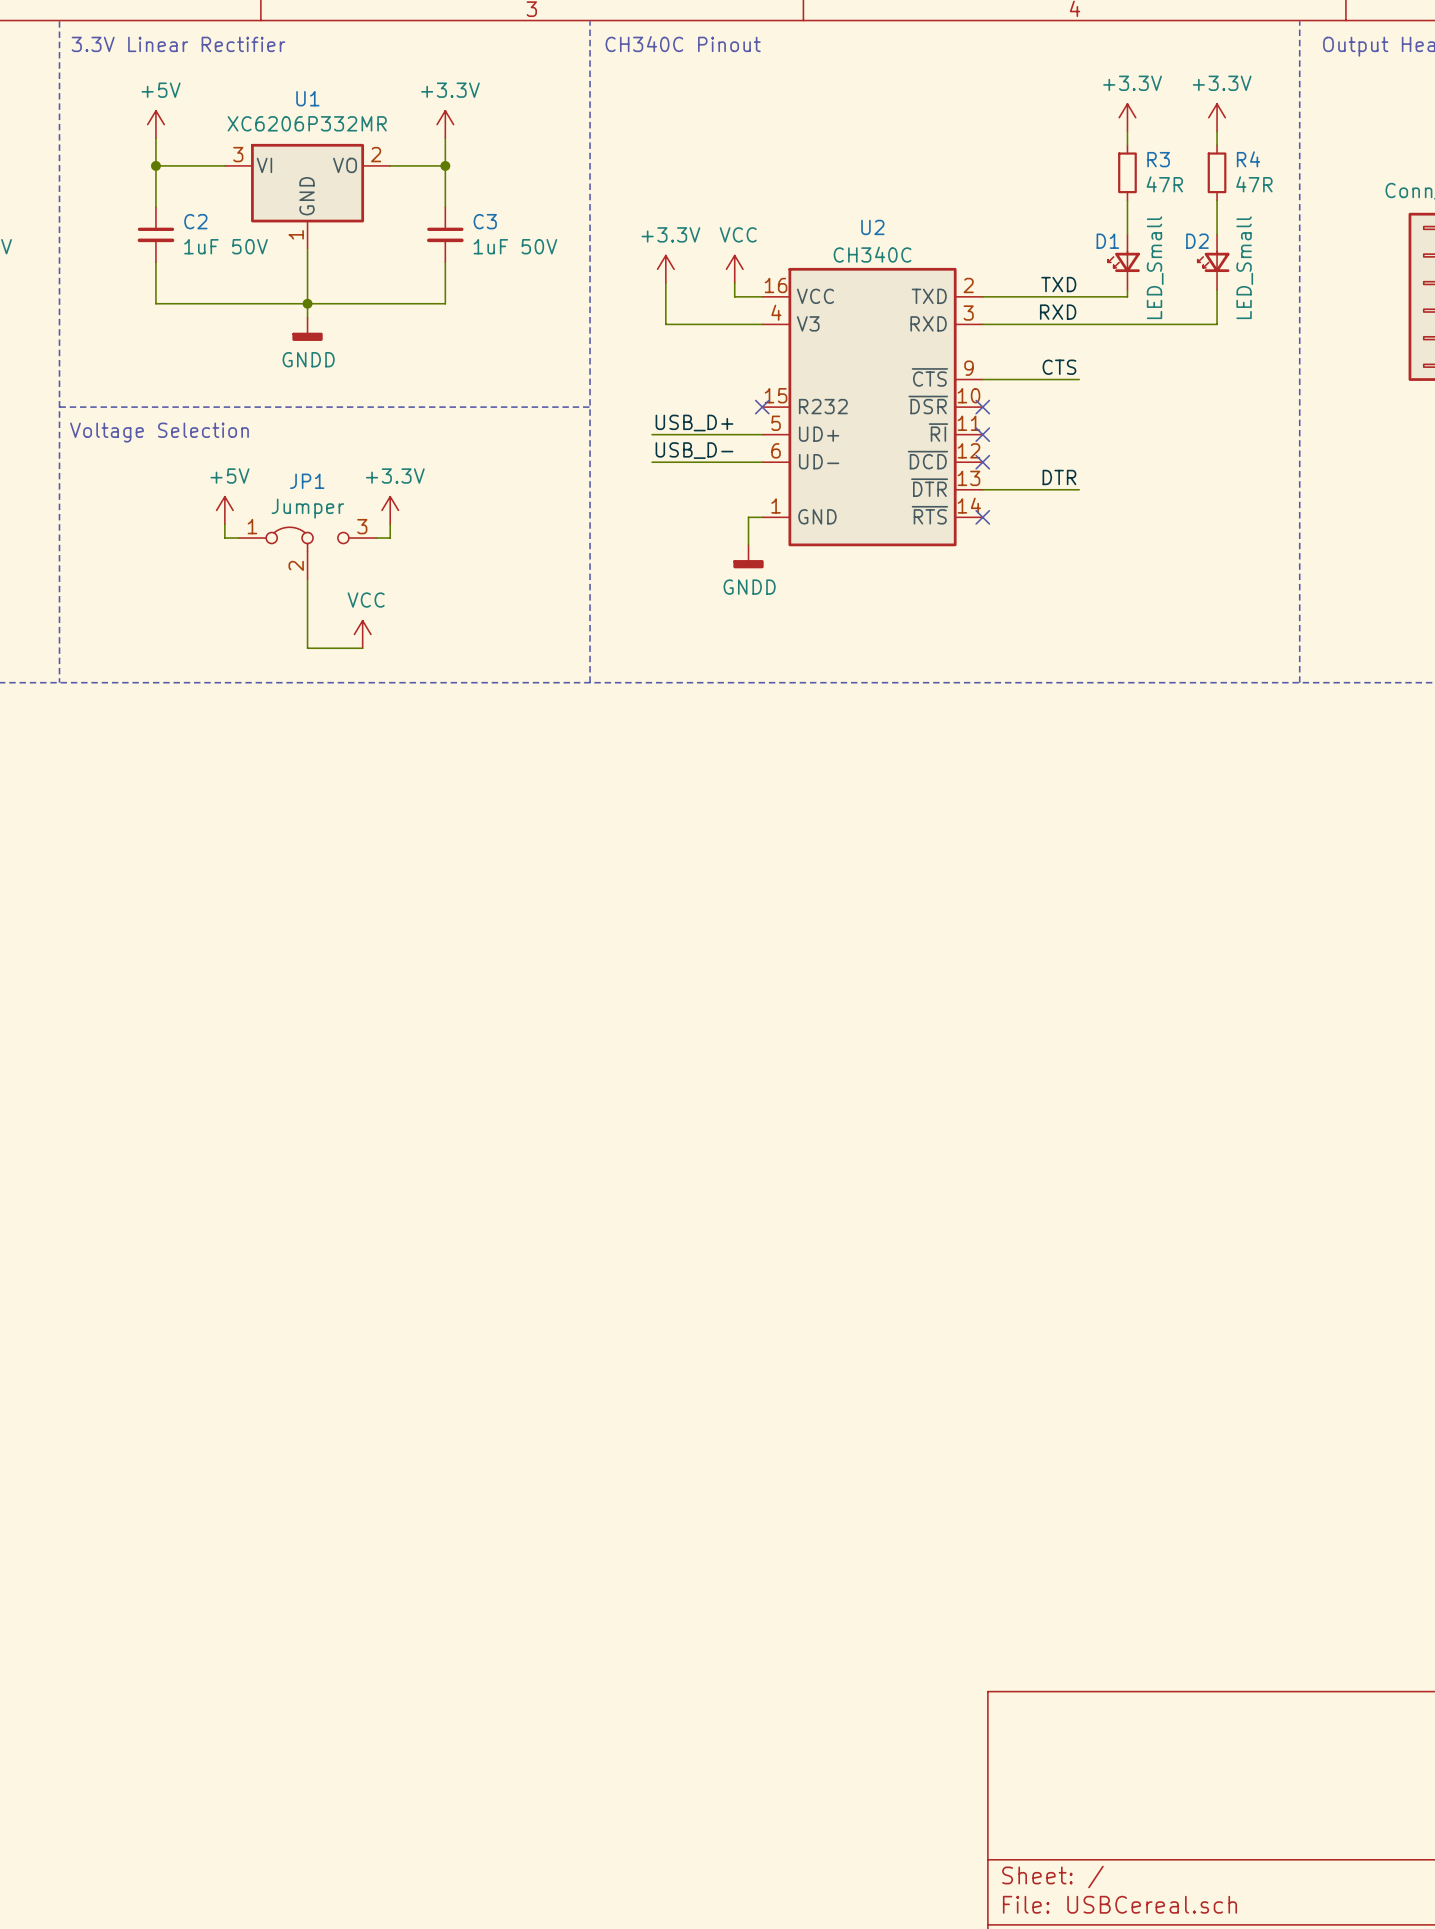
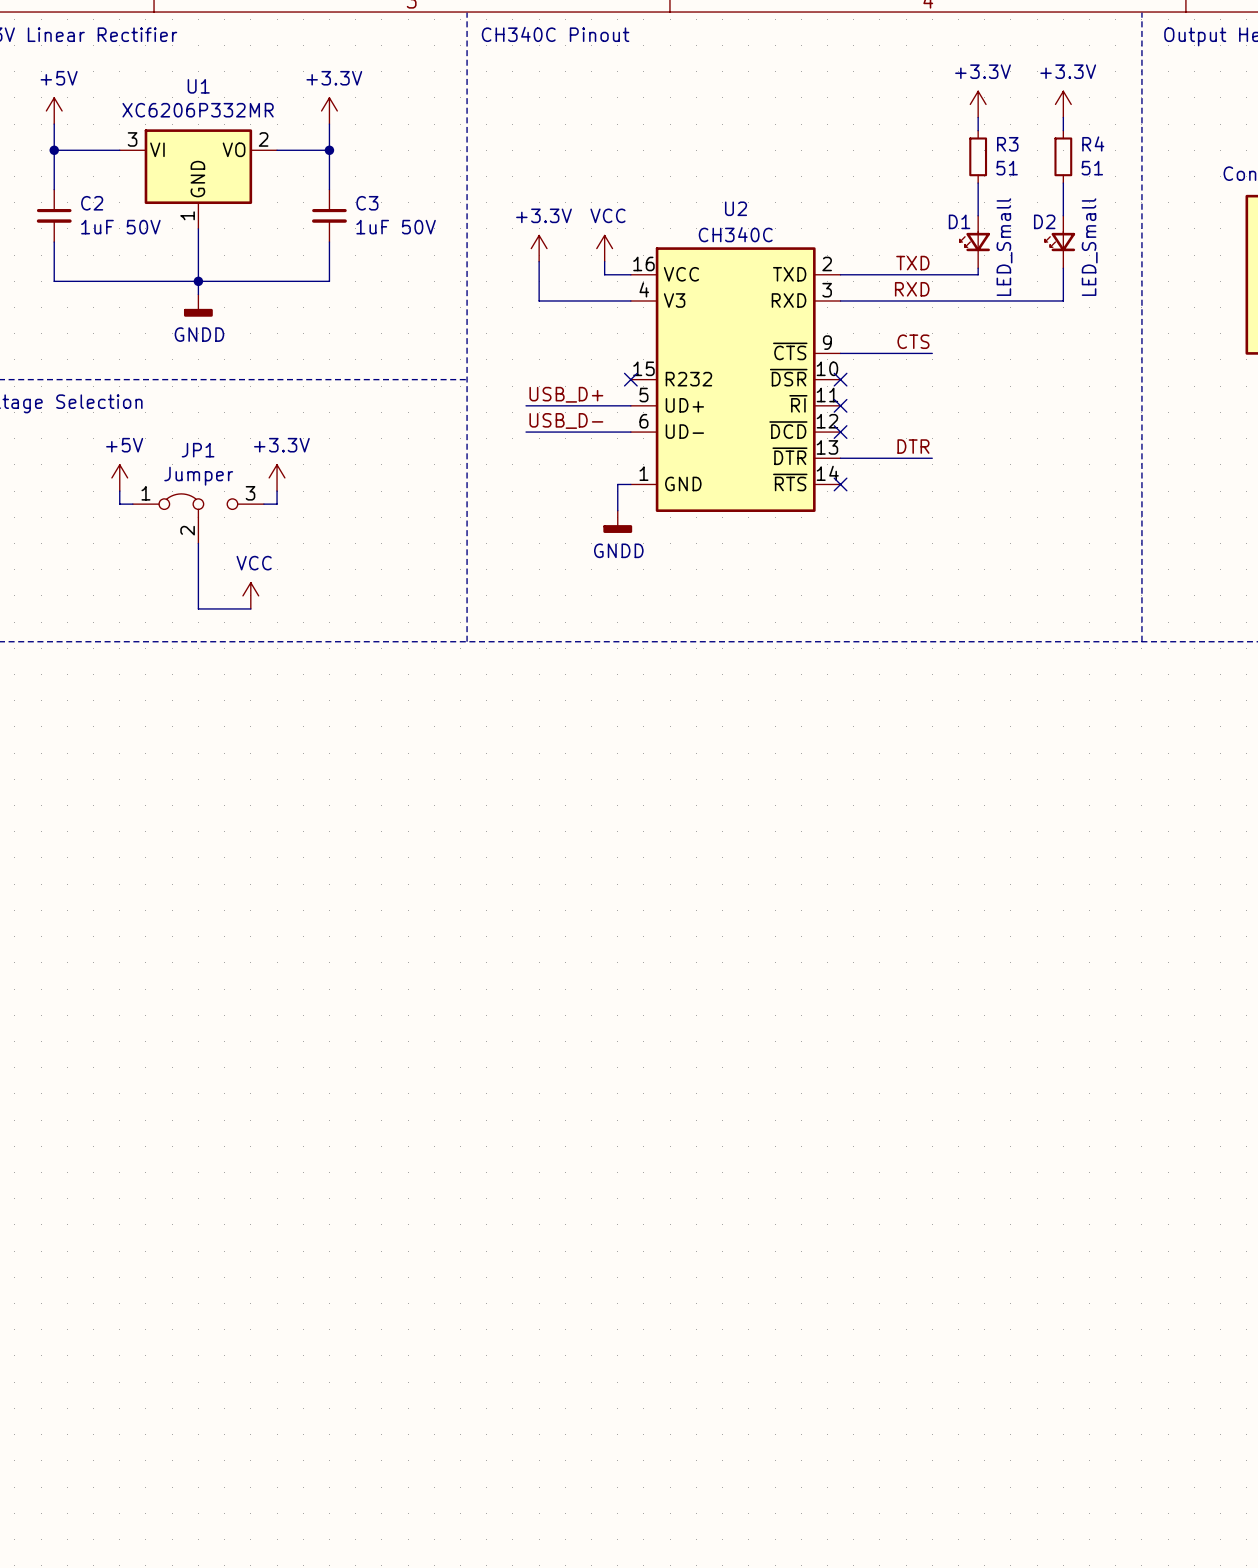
R3 value: 47R (1164, 184) -> 51 (1007, 168)
R4 value: 47R (1254, 184) -> 51 (1092, 168)

